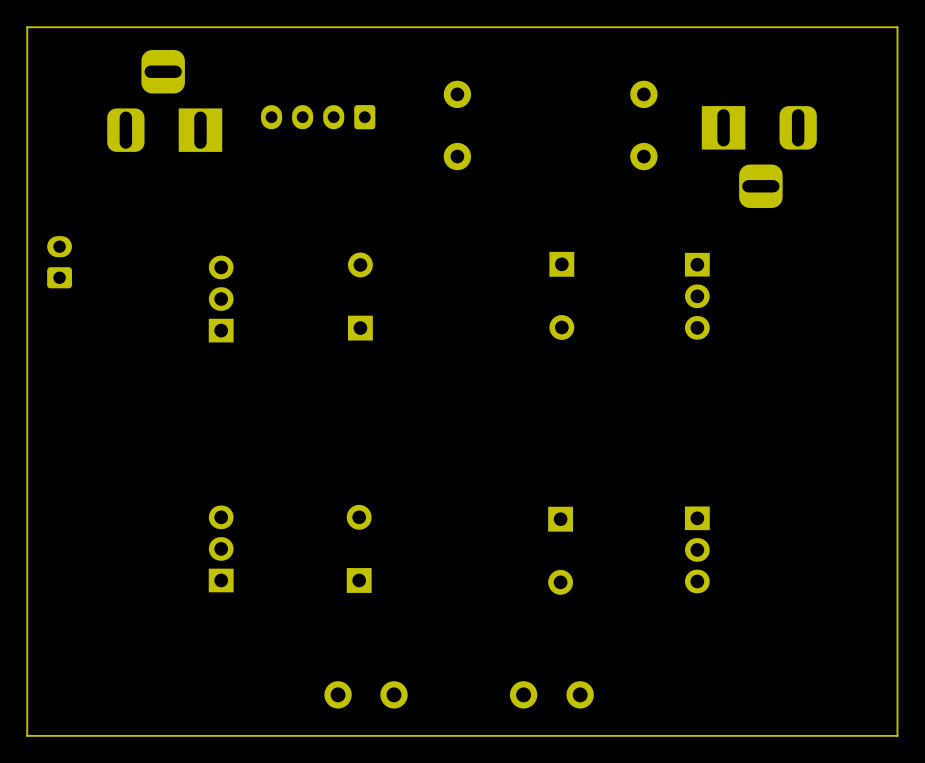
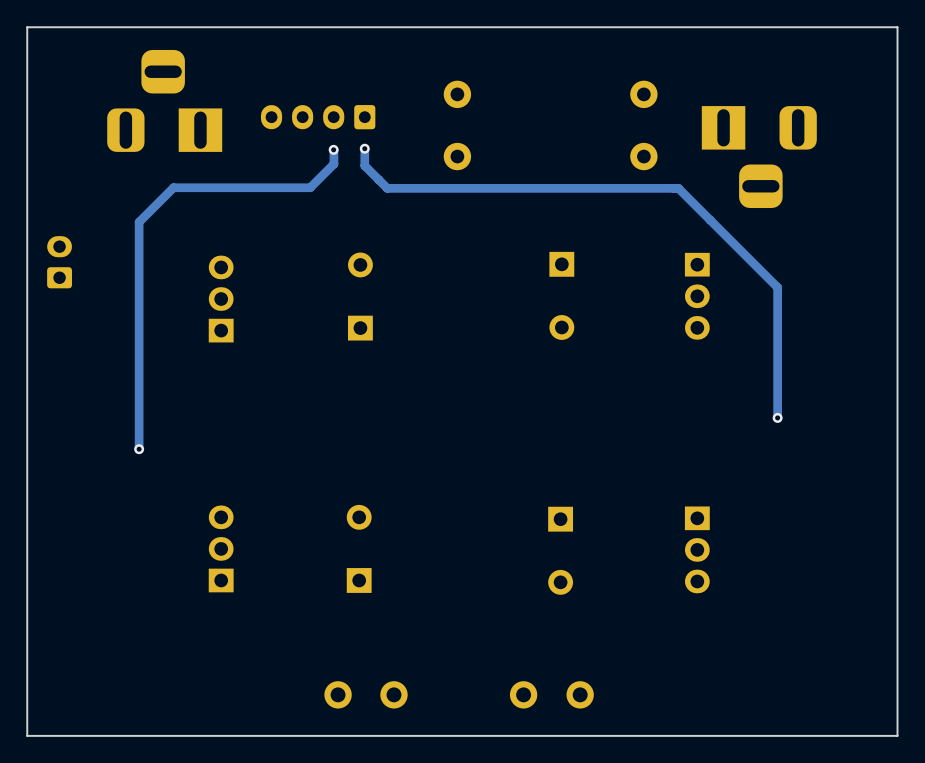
track: none -> (364, 148) (364, 165) (387, 188) (678, 188) (777, 287) (777, 417)
via: none -> (364, 148)
track: none -> (333, 149) (333, 164) (310, 187) (173, 187) (139, 222) (139, 449)
via: none -> (333, 149)
via: none -> (777, 417)
via: none -> (139, 449)

